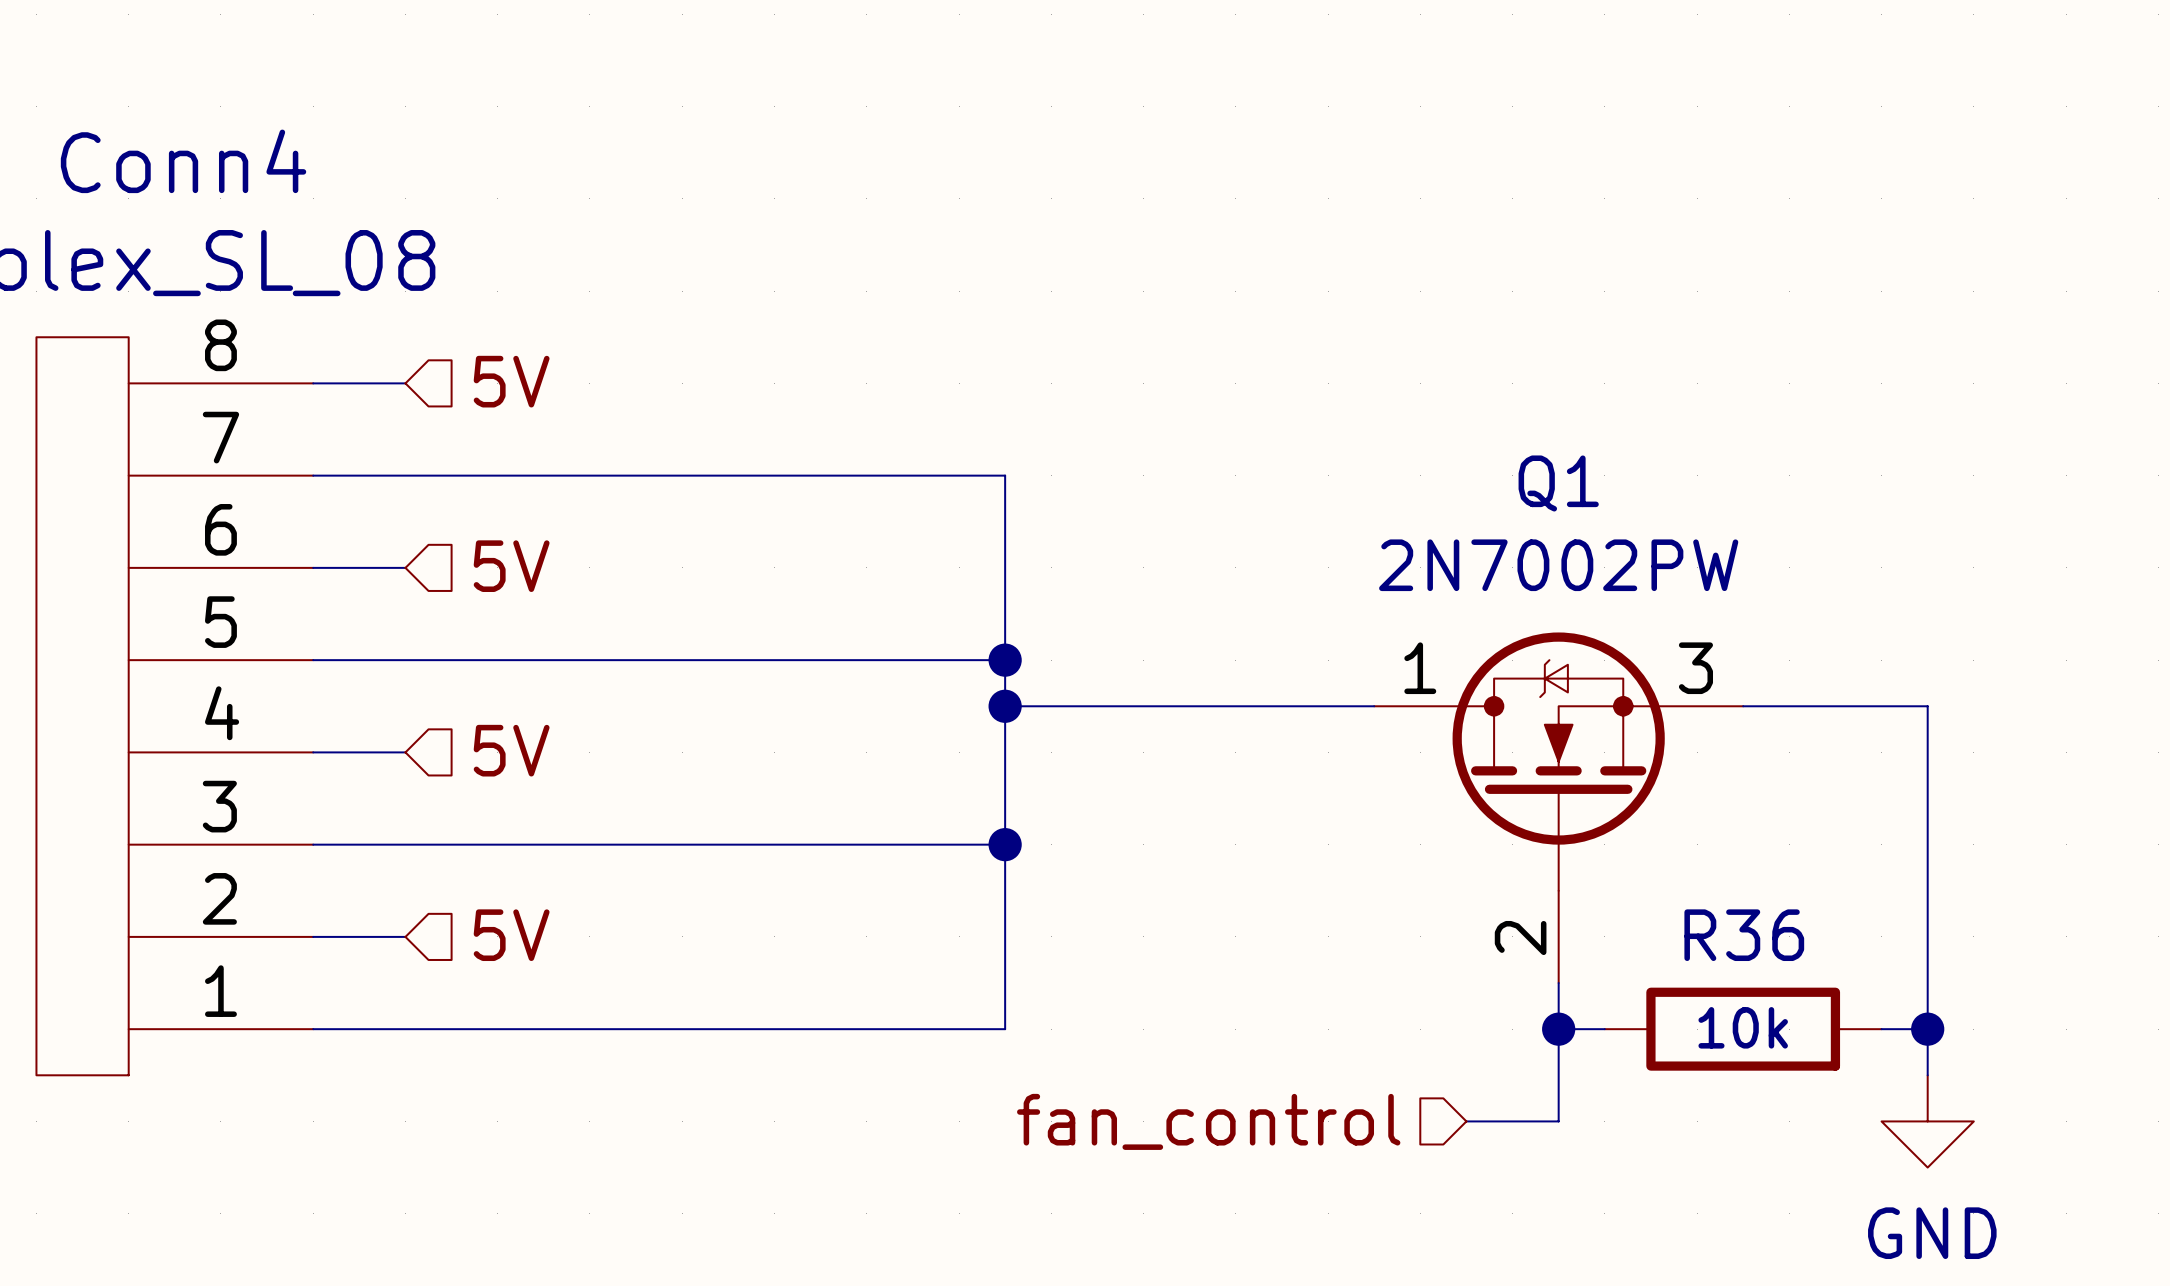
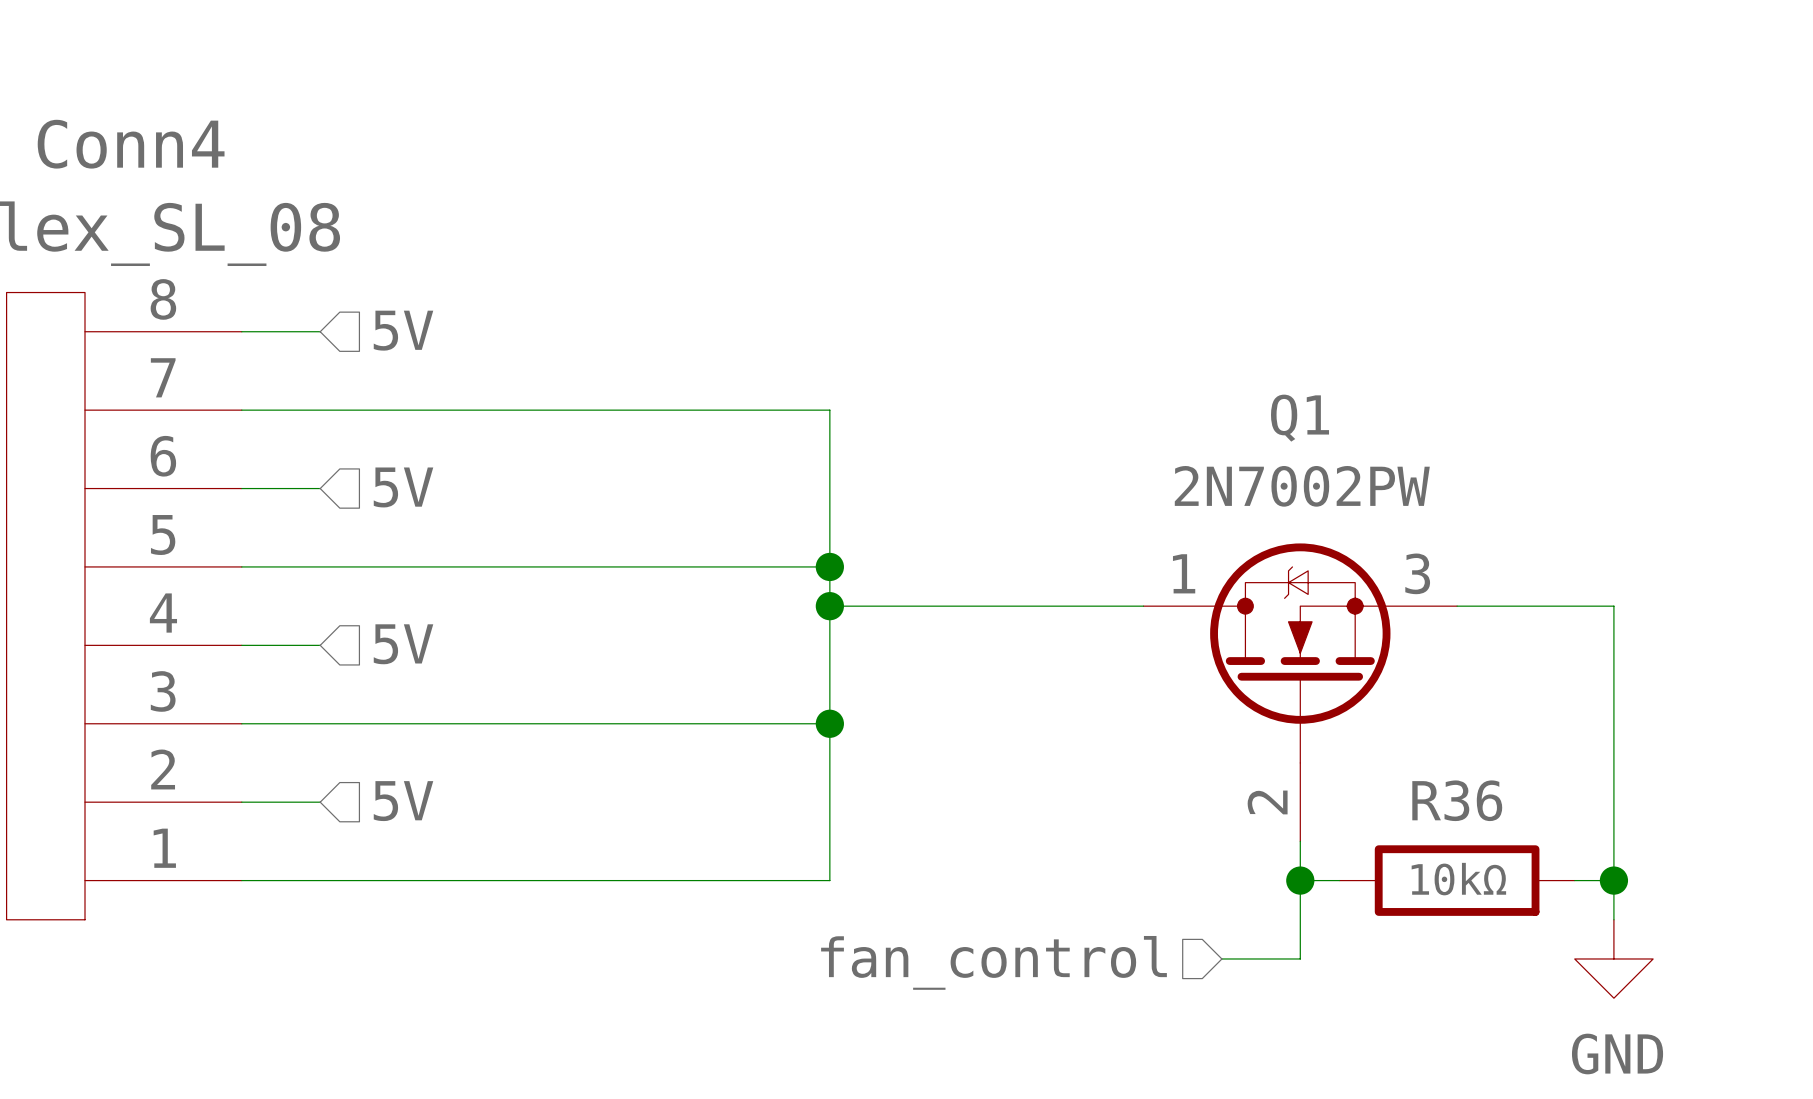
R36 value: 10k (1743, 1027) -> 10kΩ (1458, 879)

